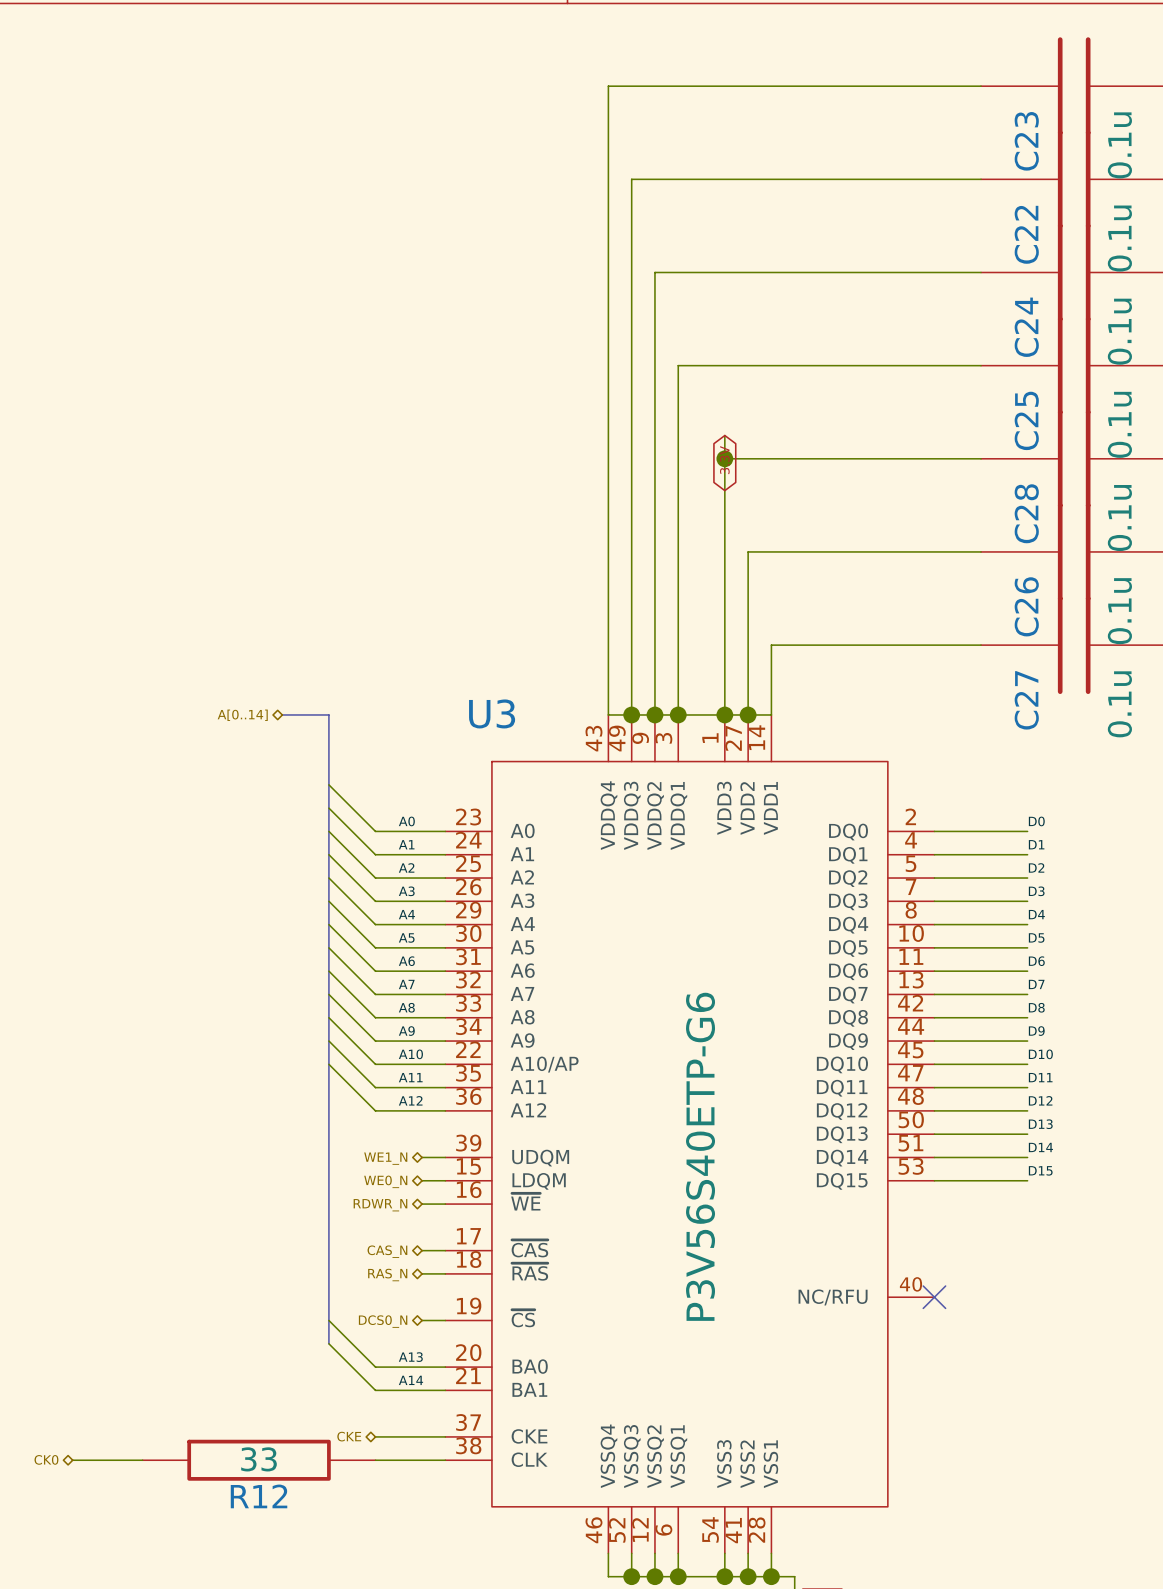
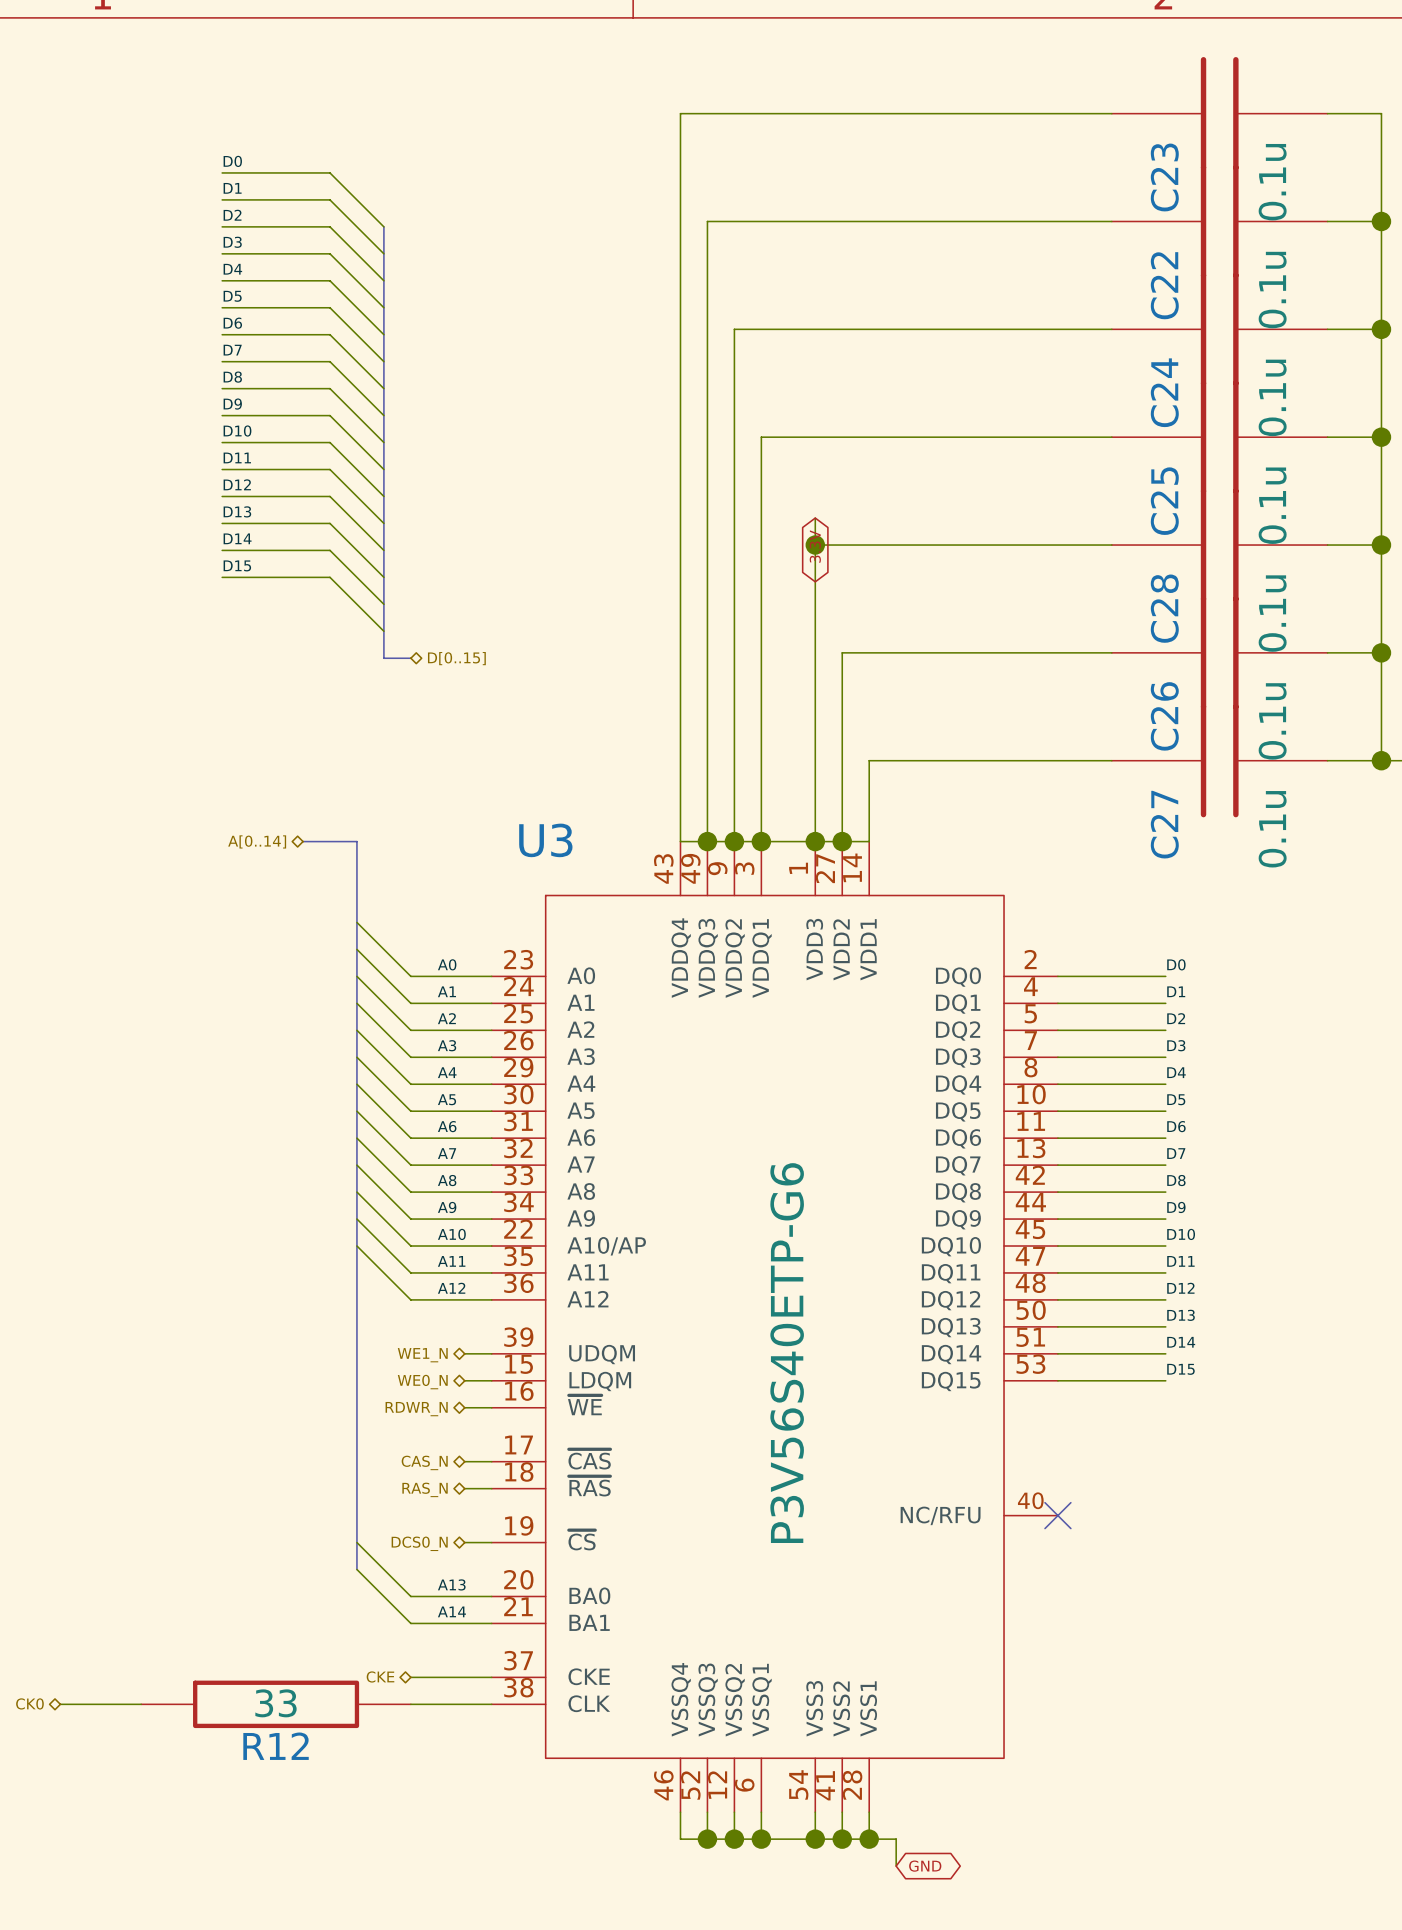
label: none -> D0 (232, 161)
wire: none -> (222, 172) (329, 172) (383, 226)
label: none -> D1 (232, 188)
wire: none -> (222, 199) (329, 199) (383, 253)
label: none -> D2 (232, 215)
wire: none -> (222, 226) (329, 226) (383, 280)
bus: none -> (383, 226) (383, 658) (410, 658)
label: none -> D3 (232, 242)
wire: none -> (222, 253) (329, 253) (383, 307)
label: none -> D4 (232, 269)
wire: none -> (222, 280) (329, 280) (383, 334)
label: none -> D5 (232, 296)
wire: none -> (222, 307) (329, 307) (383, 361)
label: none -> D6 (232, 323)
wire: none -> (222, 334) (329, 334) (383, 388)
label: none -> D7 (232, 350)
wire: none -> (222, 361) (329, 361) (383, 415)
label: none -> D8 (232, 377)
wire: none -> (222, 388) (329, 388) (383, 442)
label: none -> D9 (232, 404)
wire: none -> (222, 415) (329, 415) (383, 469)
label: none -> D10 (237, 431)
wire: none -> (222, 442) (329, 442) (383, 496)
label: none -> D11 (237, 457)
wire: none -> (222, 469) (329, 469) (383, 523)
label: none -> D12 (237, 484)
wire: none -> (222, 496) (329, 496) (383, 550)
label: none -> D13 (237, 511)
wire: none -> (222, 523) (329, 523) (383, 577)
label: none -> D14 (237, 538)
wire: none -> (222, 550) (329, 550) (383, 604)
label: none -> D15 (237, 565)
wire: none -> (222, 577) (329, 577) (383, 631)
hierarchical label: none -> D[0..15] (456, 658)

